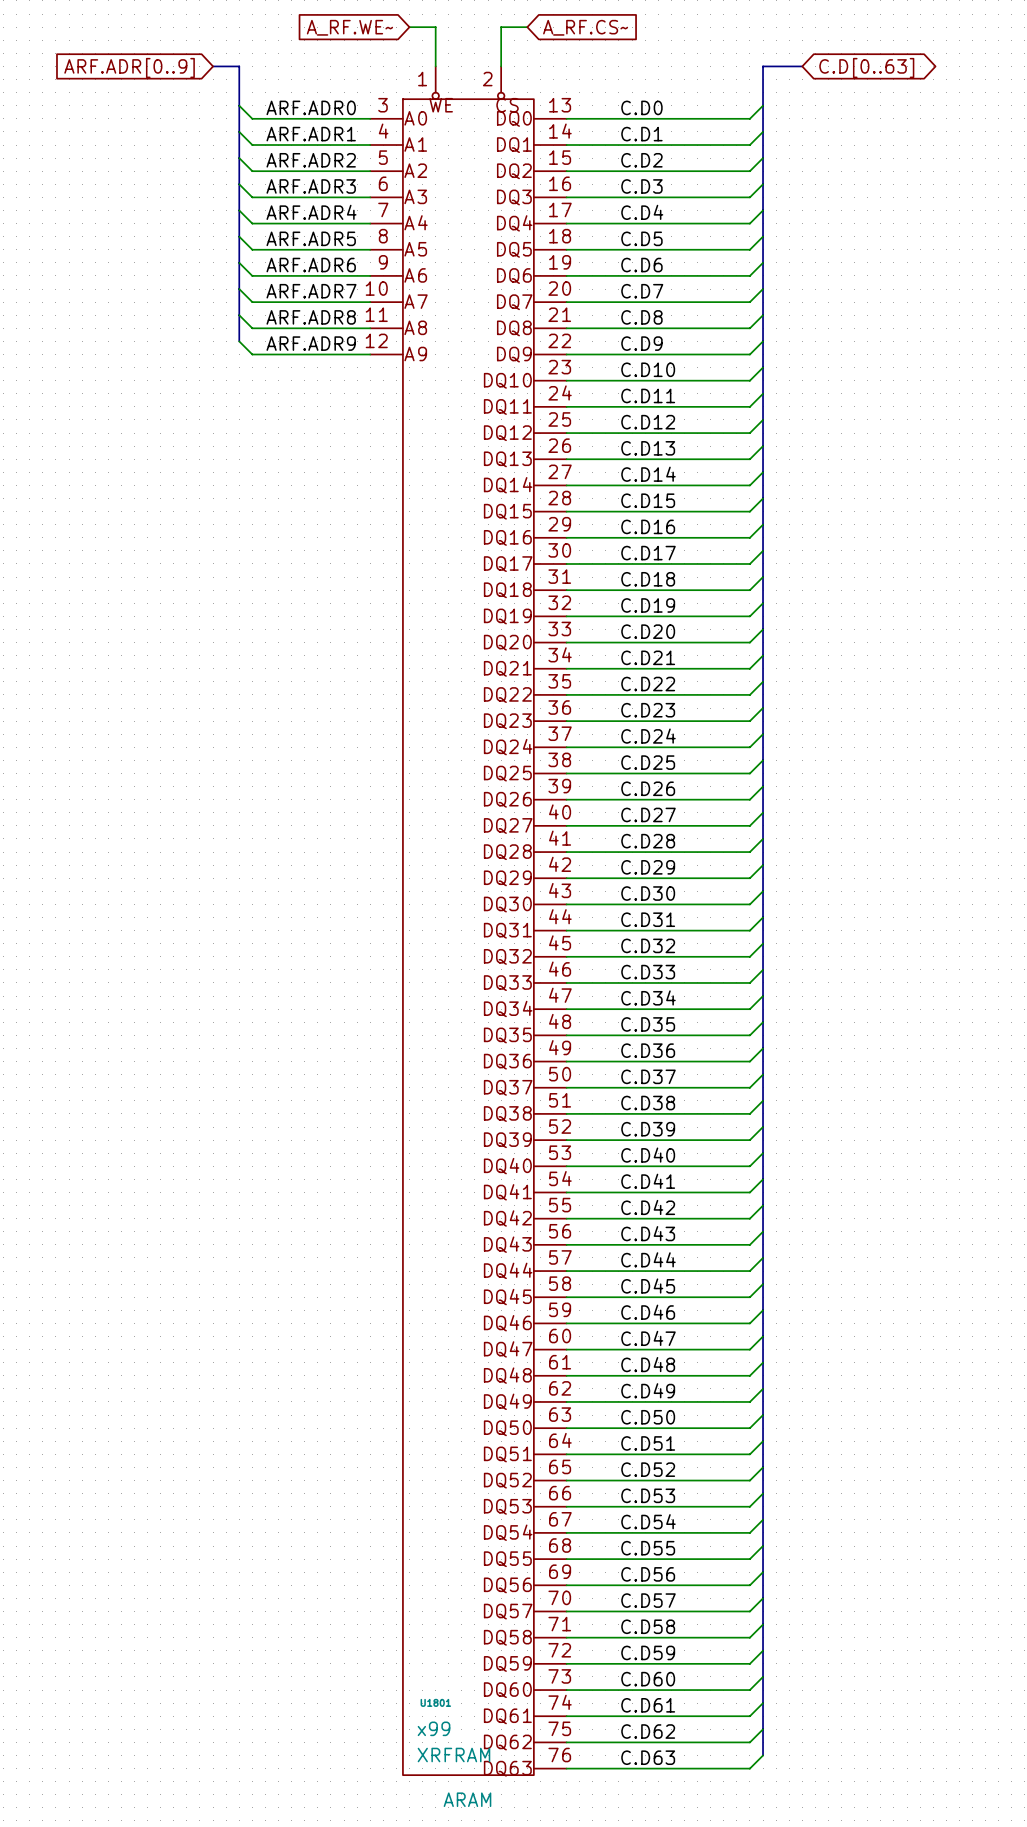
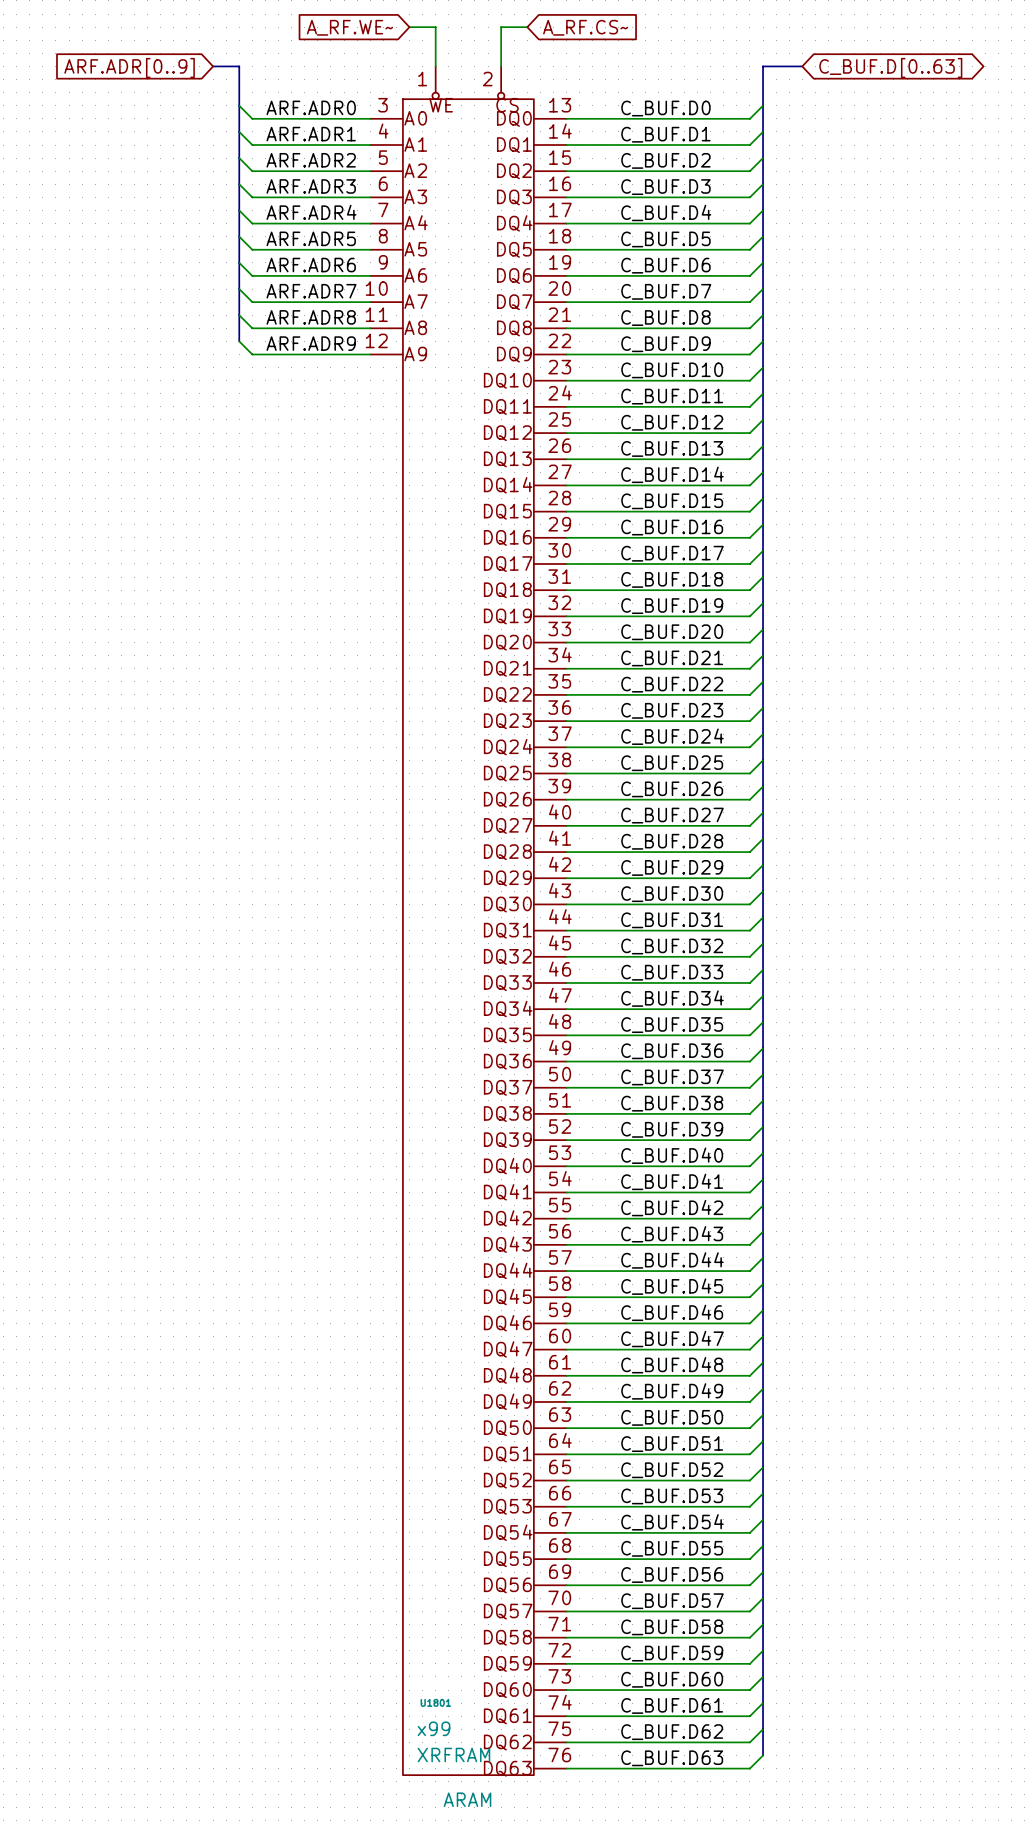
global label: C.D[0..63] (866, 68) -> C_BUF.D[0..63] (890, 68)
label: C.D0 (641, 107) -> C_BUF.D0 (665, 108)
label: C.D1 (641, 134) -> C_BUF.D1 (665, 134)
label: C.D2 (641, 160) -> C_BUF.D2 (665, 160)
label: C.D3 (641, 186) -> C_BUF.D3 (665, 187)
label: C.D4 (642, 212) -> C_BUF.D4 (666, 212)
label: C.D5 (641, 238) -> C_BUF.D5 (665, 239)
label: C.D6 (641, 265) -> C_BUF.D6 (665, 265)
label: C.D7 (642, 291) -> C_BUF.D7 (666, 291)
label: C.D8 (641, 317) -> C_BUF.D8 (665, 318)
label: C.D9 (641, 343) -> C_BUF.D9 (665, 344)
label: C.D10 (648, 369) -> C_BUF.D10 (672, 370)
label: C.D11 (648, 395) -> C_BUF.D11 (672, 396)
label: C.D12 (648, 422) -> C_BUF.D12 (672, 422)
label: C.D13 (648, 448) -> C_BUF.D13 (672, 448)
label: C.D14 (648, 474) -> C_BUF.D14 (672, 474)
label: C.D15 (648, 500) -> C_BUF.D15 (672, 501)
label: C.D16 (648, 526) -> C_BUF.D16 (672, 527)
label: C.D17 (648, 553) -> C_BUF.D17 (672, 553)
label: C.D18 (648, 579) -> C_BUF.D18 (672, 579)
label: C.D19 (648, 605) -> C_BUF.D19 (672, 606)
label: C.D20 (648, 631) -> C_BUF.D20 (672, 632)
label: C.D21 (648, 657) -> C_BUF.D21 (672, 658)
label: C.D22 (648, 684) -> C_BUF.D22 (672, 684)
label: C.D23 (648, 710) -> C_BUF.D23 (672, 710)
label: C.D24 (648, 736) -> C_BUF.D24 (672, 736)
label: C.D25 (648, 762) -> C_BUF.D25 (672, 763)
label: C.D26 (648, 788) -> C_BUF.D26 (672, 789)
label: C.D27 (648, 814) -> C_BUF.D27 (672, 815)
label: C.D28 (648, 841) -> C_BUF.D28 (672, 841)
label: C.D29 (648, 867) -> C_BUF.D29 (672, 867)
label: C.D30 (648, 893) -> C_BUF.D30 (672, 894)
label: C.D31 (648, 919) -> C_BUF.D31 (672, 920)
label: C.D32 (648, 945) -> C_BUF.D32 (672, 946)
label: C.D33 (648, 972) -> C_BUF.D33 (672, 972)
label: C.D34 (648, 997) -> C_BUF.D34 (672, 998)
label: C.D35 (648, 1024) -> C_BUF.D35 (672, 1025)
label: C.D36 (648, 1050) -> C_BUF.D36 (672, 1051)
label: C.D37 (648, 1076) -> C_BUF.D37 (672, 1077)
label: C.D38 (648, 1103) -> C_BUF.D38 (672, 1103)
label: C.D39 (648, 1129) -> C_BUF.D39 (672, 1129)
label: C.D40 (648, 1155) -> C_BUF.D40 (672, 1155)
label: C.D41 (648, 1181) -> C_BUF.D41 (672, 1181)
label: C.D42 (648, 1207) -> C_BUF.D42 (672, 1208)
label: C.D43 (648, 1233) -> C_BUF.D43 (672, 1234)
label: C.D44 (648, 1259) -> C_BUF.D44 (672, 1260)
label: C.D45 (648, 1286) -> C_BUF.D45 (672, 1286)
label: C.D46 (648, 1312) -> C_BUF.D46 (672, 1312)
label: C.D47 (648, 1338) -> C_BUF.D47 (672, 1339)
label: C.D48 (648, 1364) -> C_BUF.D48 (672, 1365)
label: C.D49 (648, 1390) -> C_BUF.D49 (672, 1391)
label: C.D50 (648, 1417) -> C_BUF.D50 (672, 1417)
label: C.D51 (648, 1443) -> C_BUF.D51 (672, 1444)
label: C.D52 (648, 1469) -> C_BUF.D52 (672, 1470)
label: C.D53 (648, 1495) -> C_BUF.D53 (672, 1496)
label: C.D54 (648, 1521) -> C_BUF.D54 (672, 1522)
label: C.D55 (648, 1548) -> C_BUF.D55 (672, 1548)
label: C.D56 (648, 1574) -> C_BUF.D56 (672, 1575)
label: C.D57 (648, 1600) -> C_BUF.D57 (672, 1601)
label: C.D58 (648, 1626) -> C_BUF.D58 (672, 1627)
label: C.D59 (648, 1652) -> C_BUF.D59 (672, 1653)
label: C.D60 (648, 1679) -> C_BUF.D60 (672, 1679)
label: C.D61 (648, 1705) -> C_BUF.D61 (672, 1705)
label: C.D62 (648, 1731) -> C_BUF.D62 (672, 1732)
label: C.D63 (648, 1757) -> C_BUF.D63 (672, 1758)

